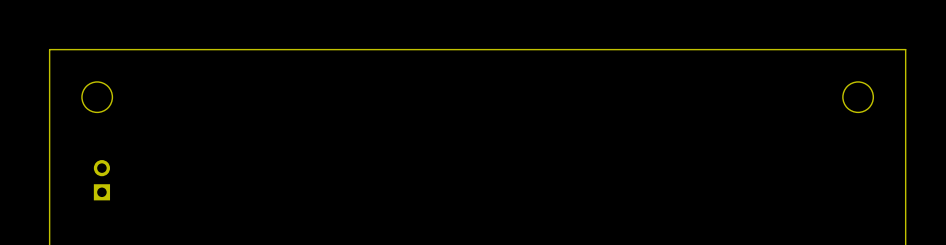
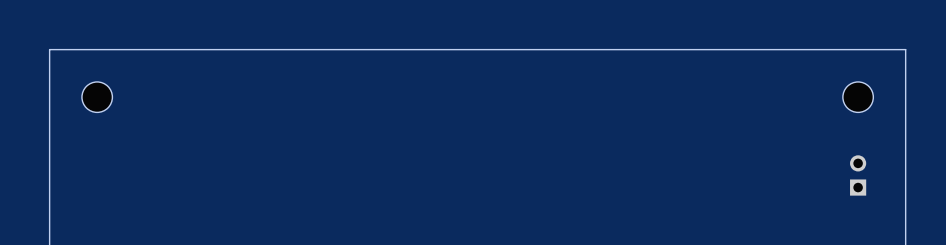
part: none -> (858, 175)
part: (101, 180) -> none

